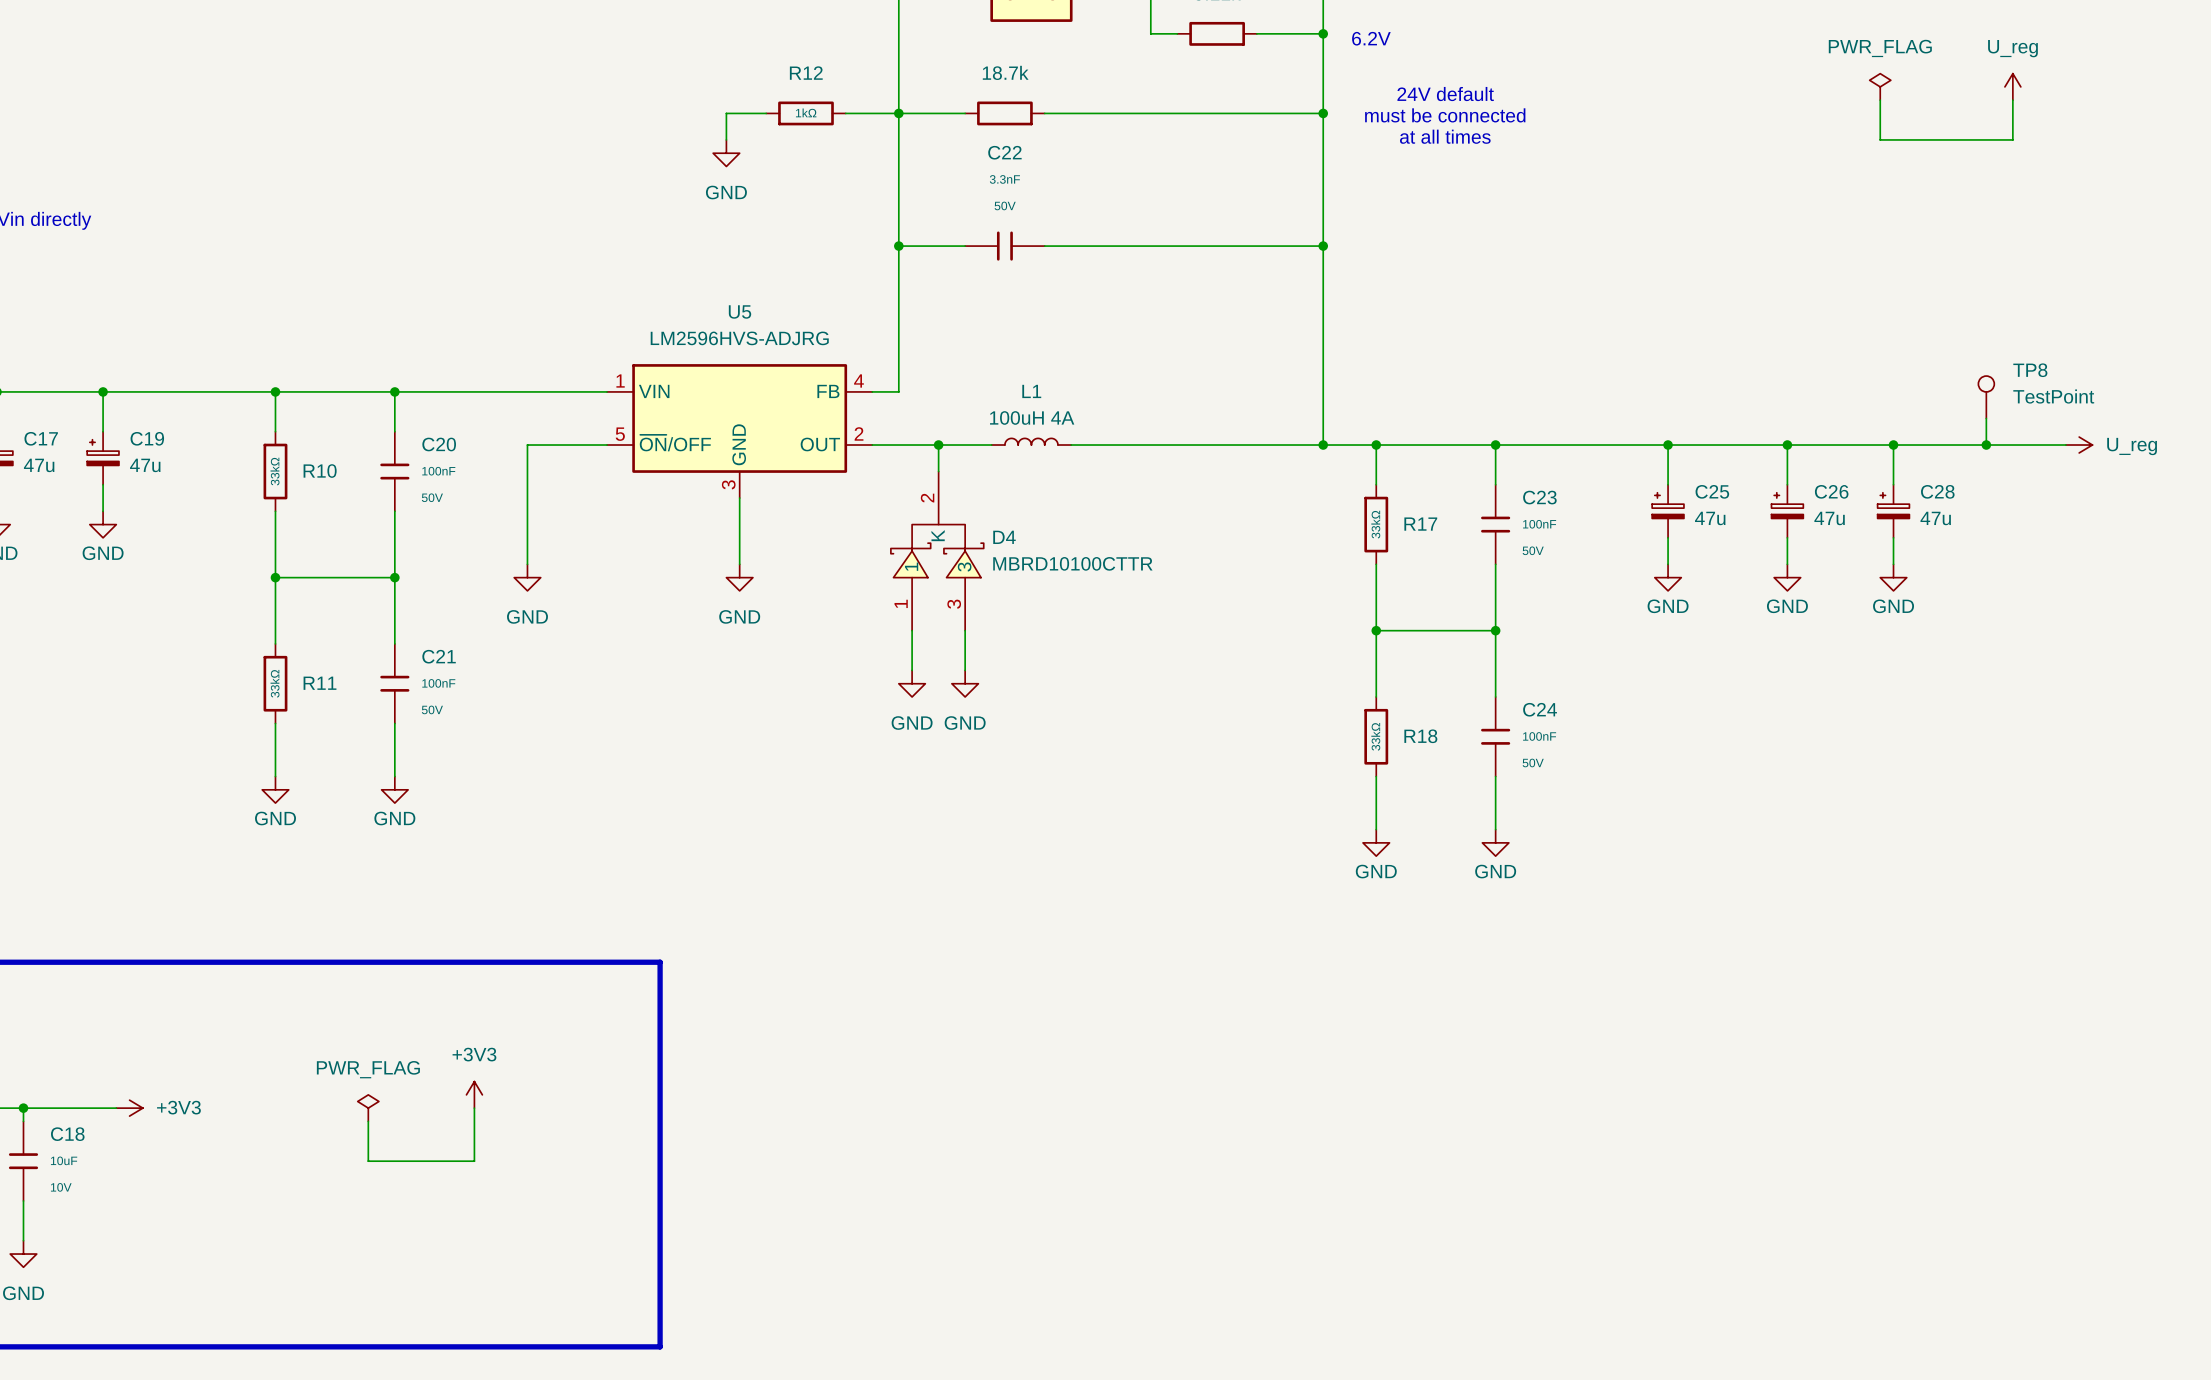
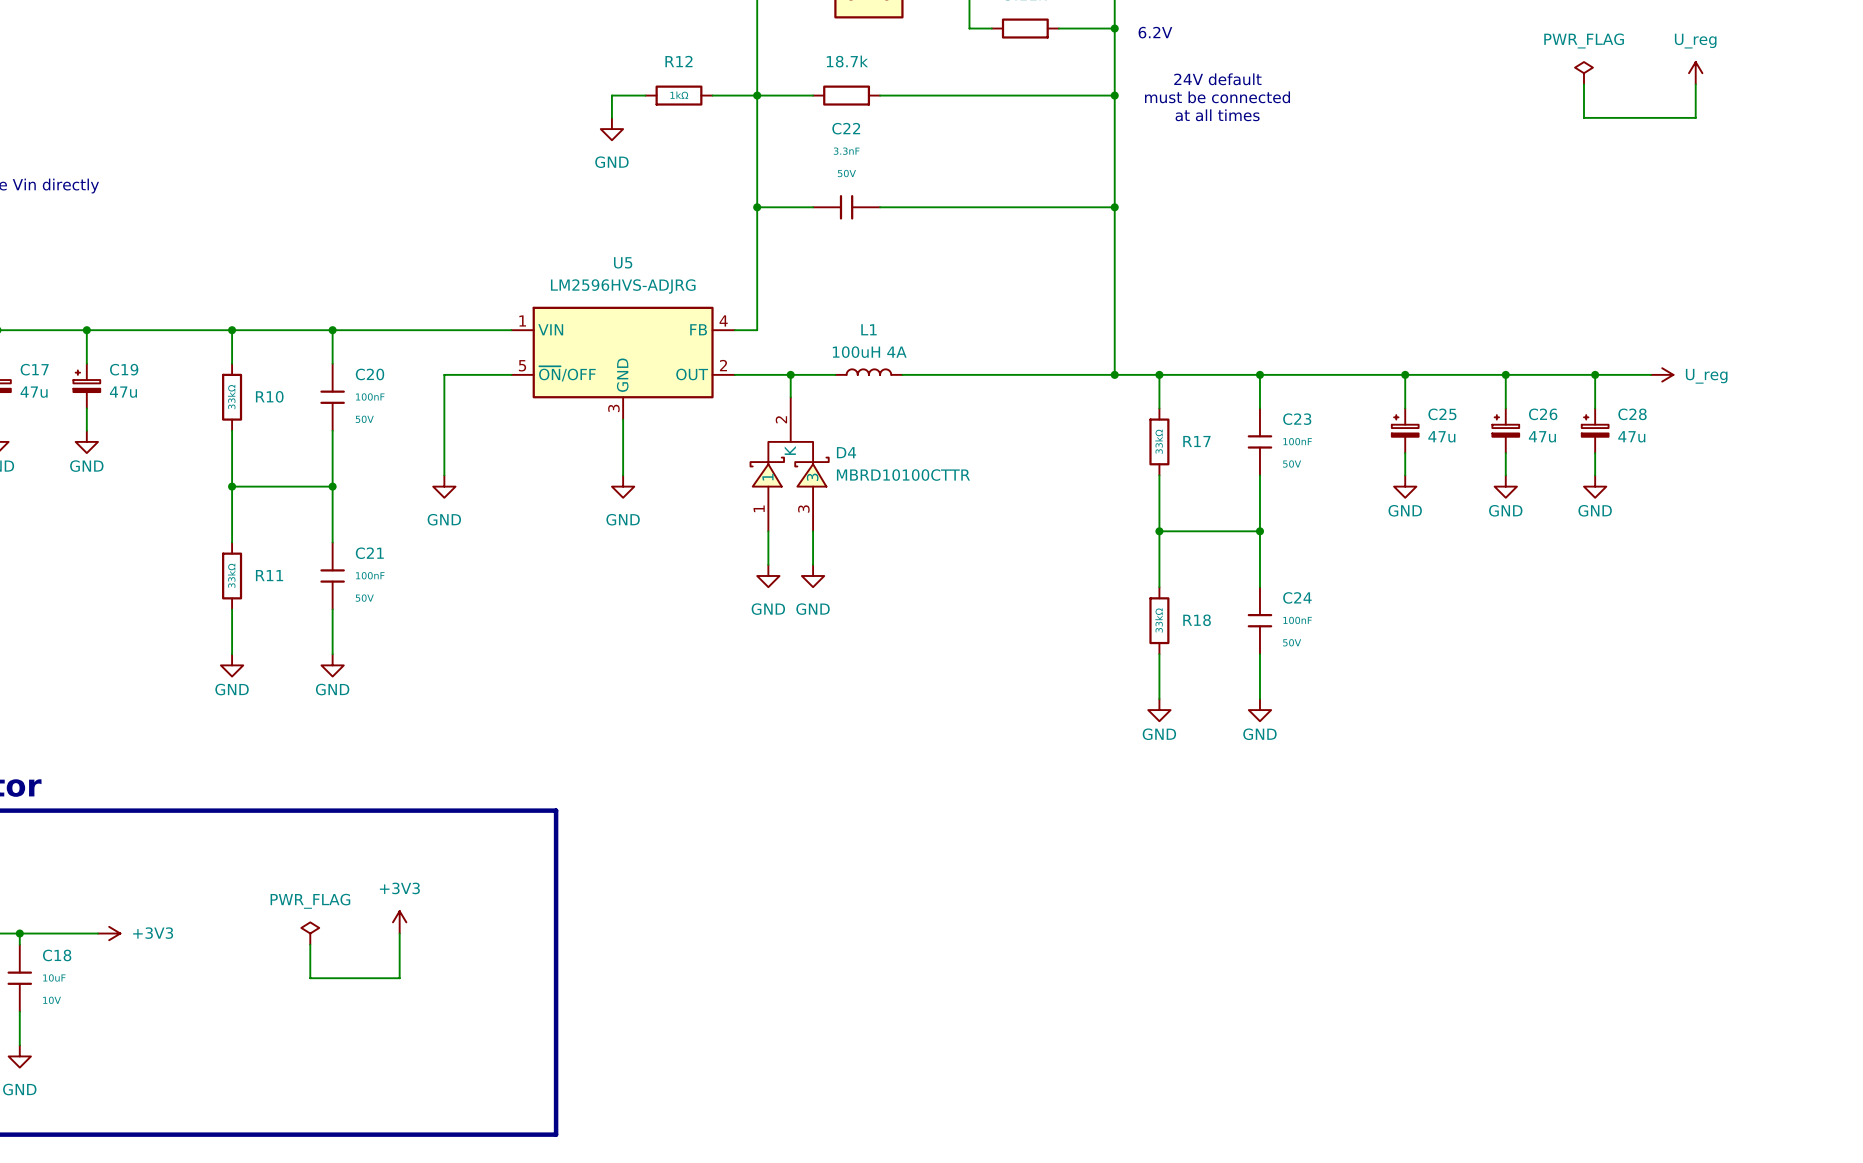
TP8: TestPoint (1986, 397) -> none
wire: (1986, 418) (1986, 445) -> none
wire: (1959, 445) (2065, 445) -> none
junction: (1986, 445) -> none
power symbol position: U_reg (2079, 445) -> U_reg (1662, 374)

